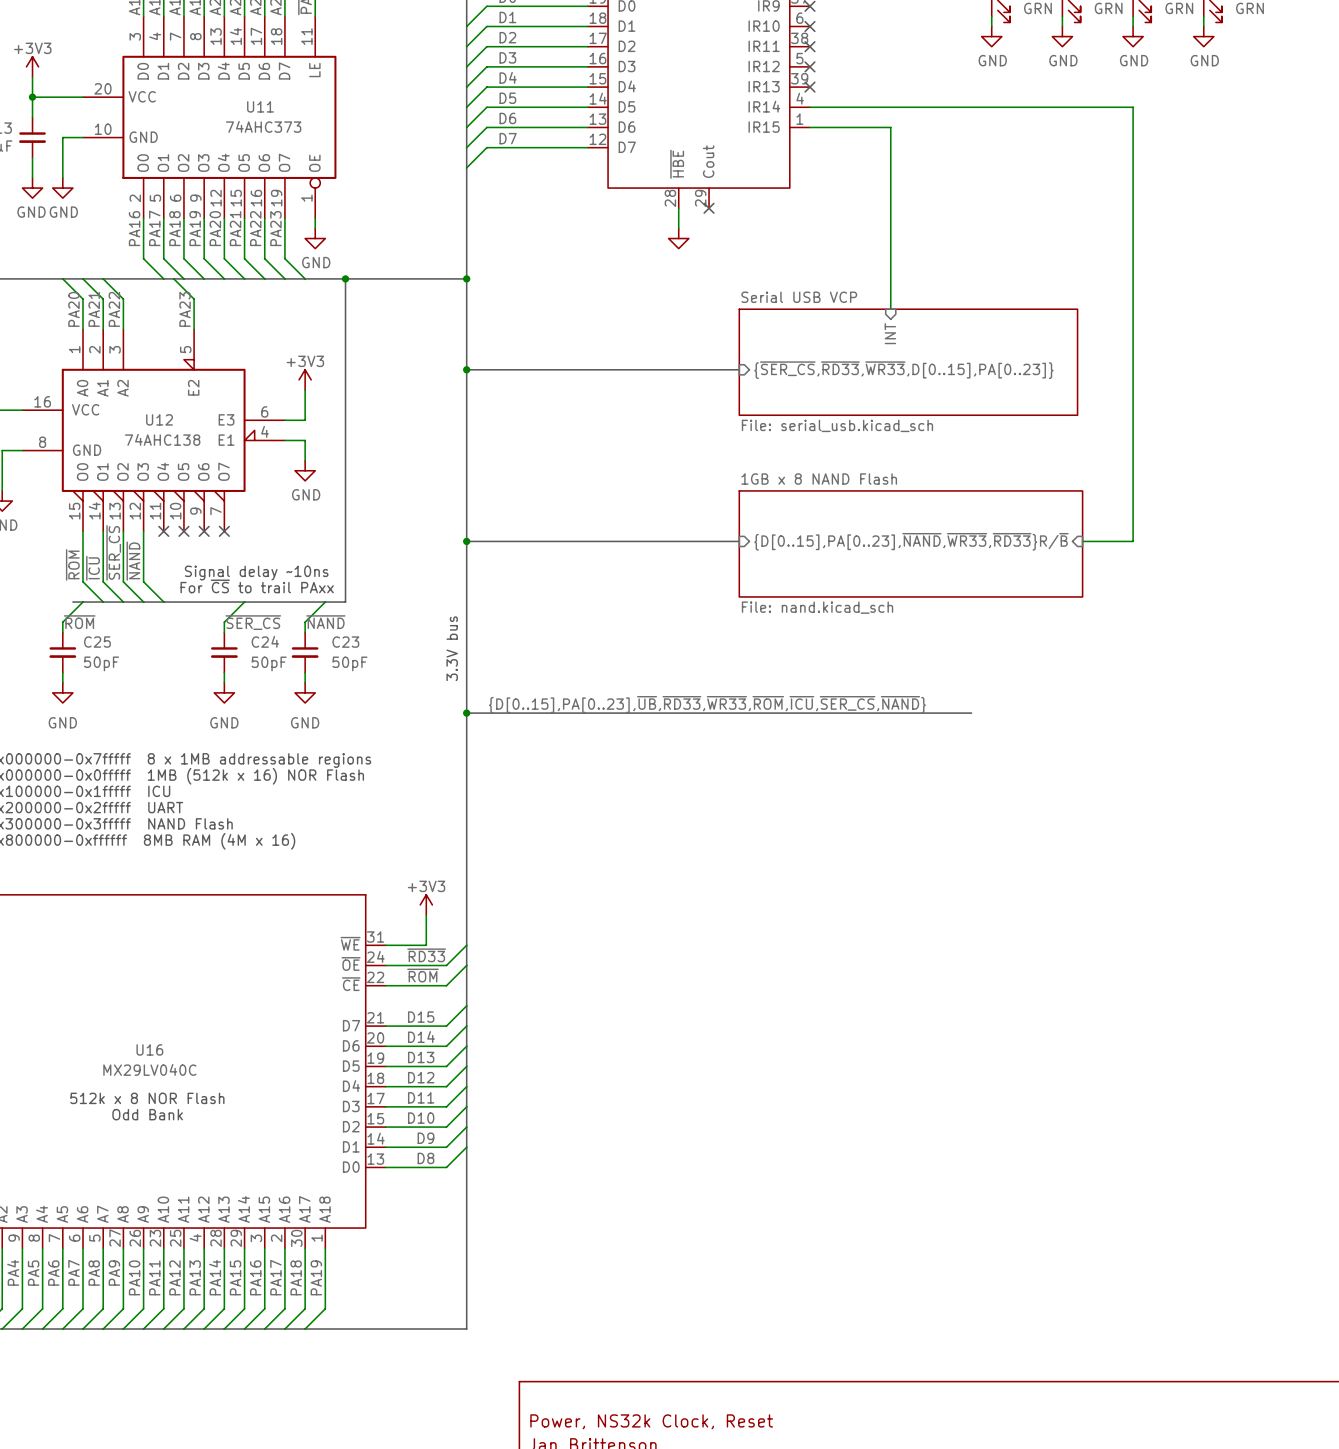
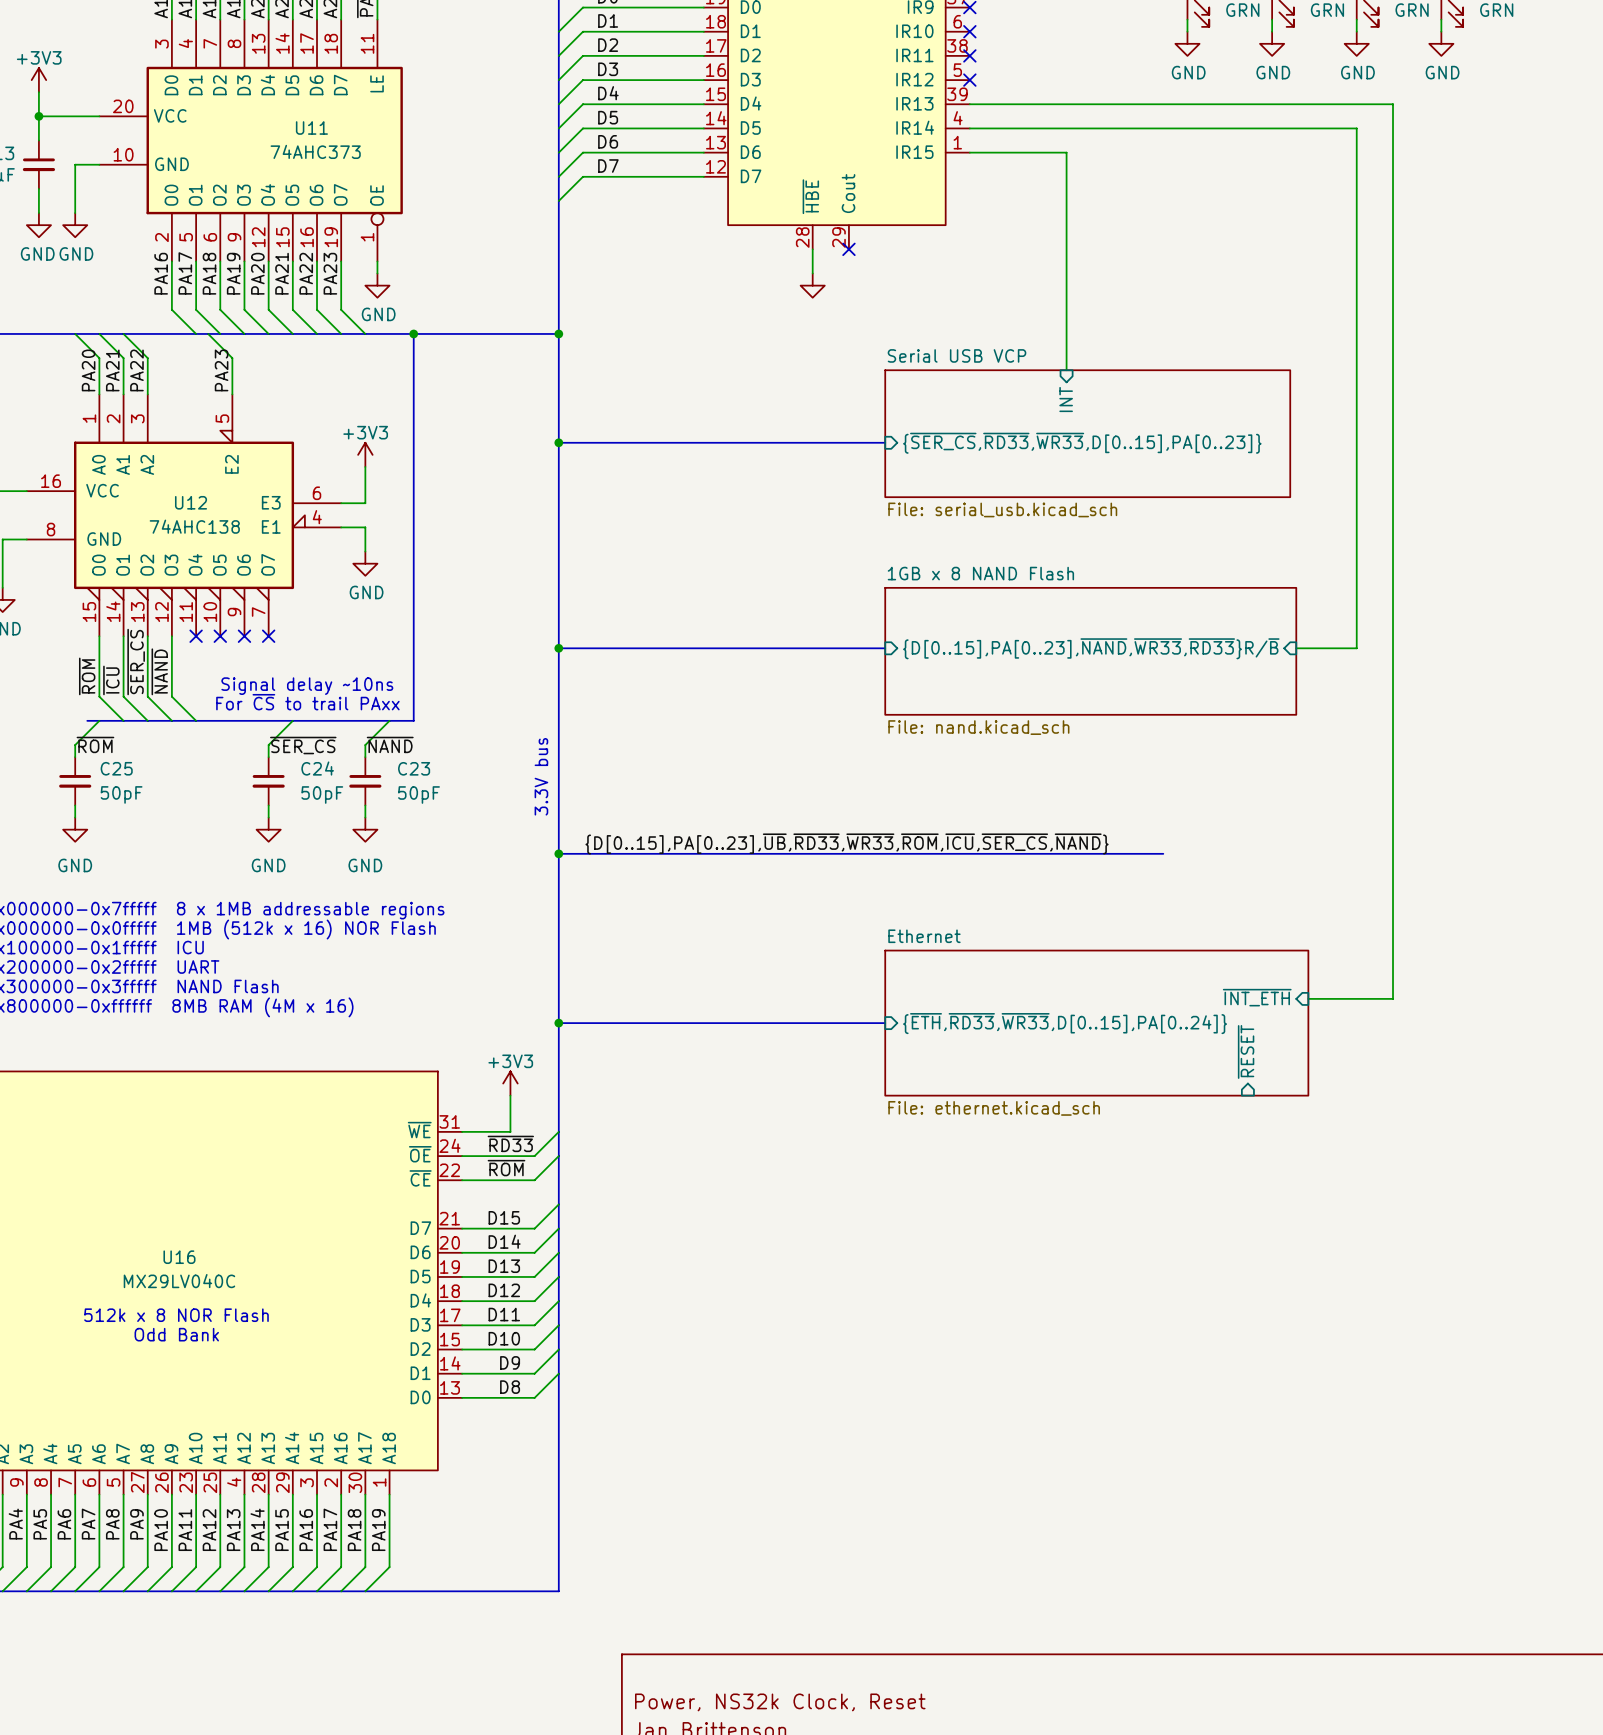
wire: none -> (969, 104) (1393, 104) (1393, 998) (1308, 998)
no-connect mark: (809, 87) -> none
sheet pin: none -> ~{INT_ETH} (1257, 997)
bus: none -> (558, 1023) (885, 1023)
junction: none -> (558, 1023)
sheet pin: none -> {~{ETH},~{RD33},~{WR33},D[0..15],PA[0..24]} (1065, 1023)
sheet Ethernet: none -> File: ethernet.kicad_sch (1096, 1023)
sheet pin: none -> ~{RESET} (1246, 1051)

